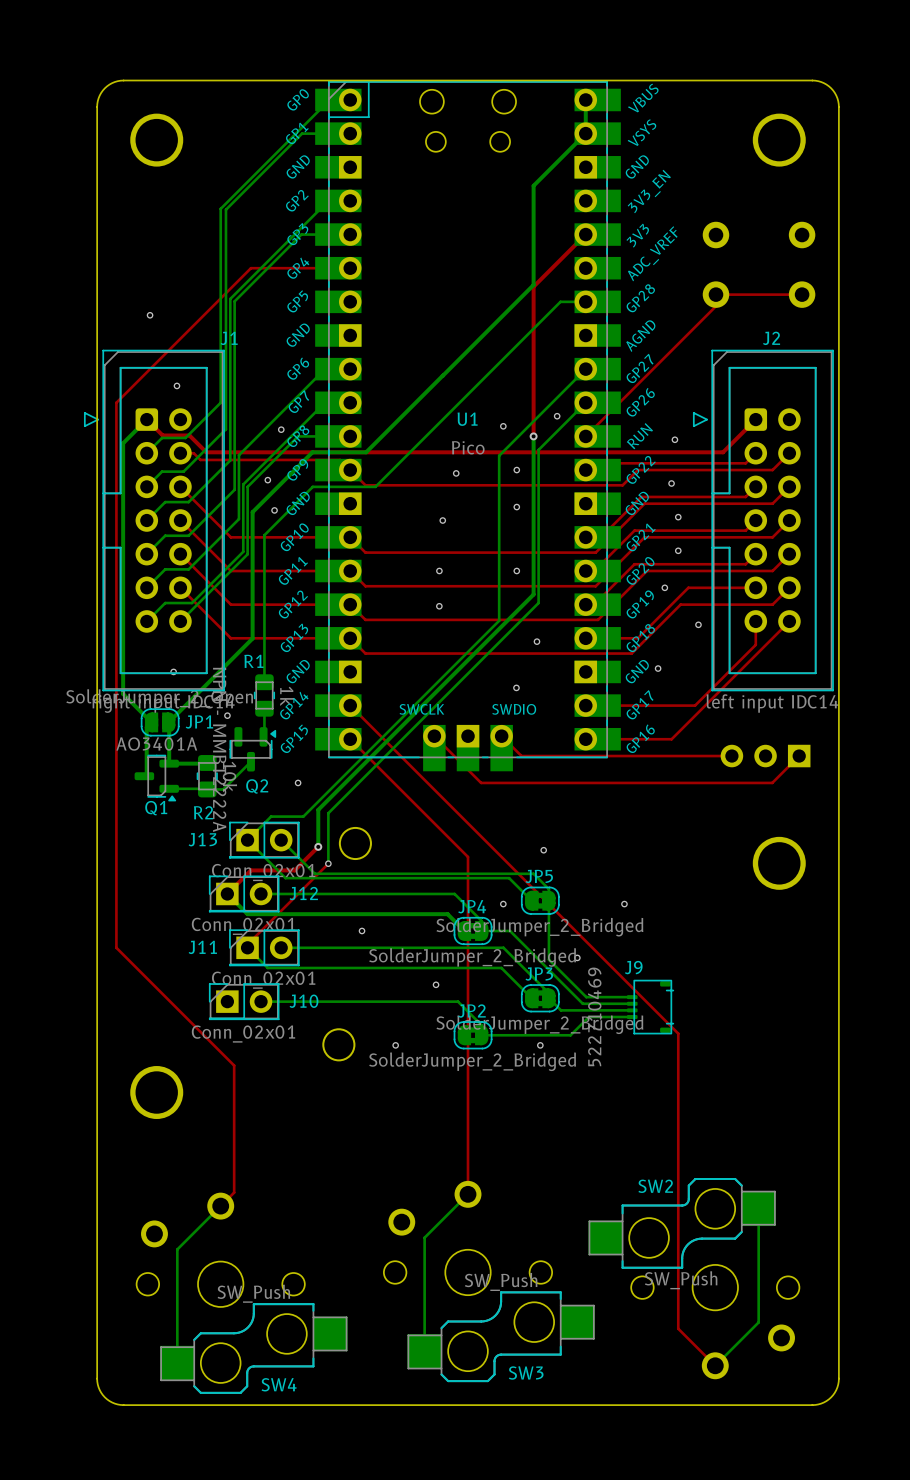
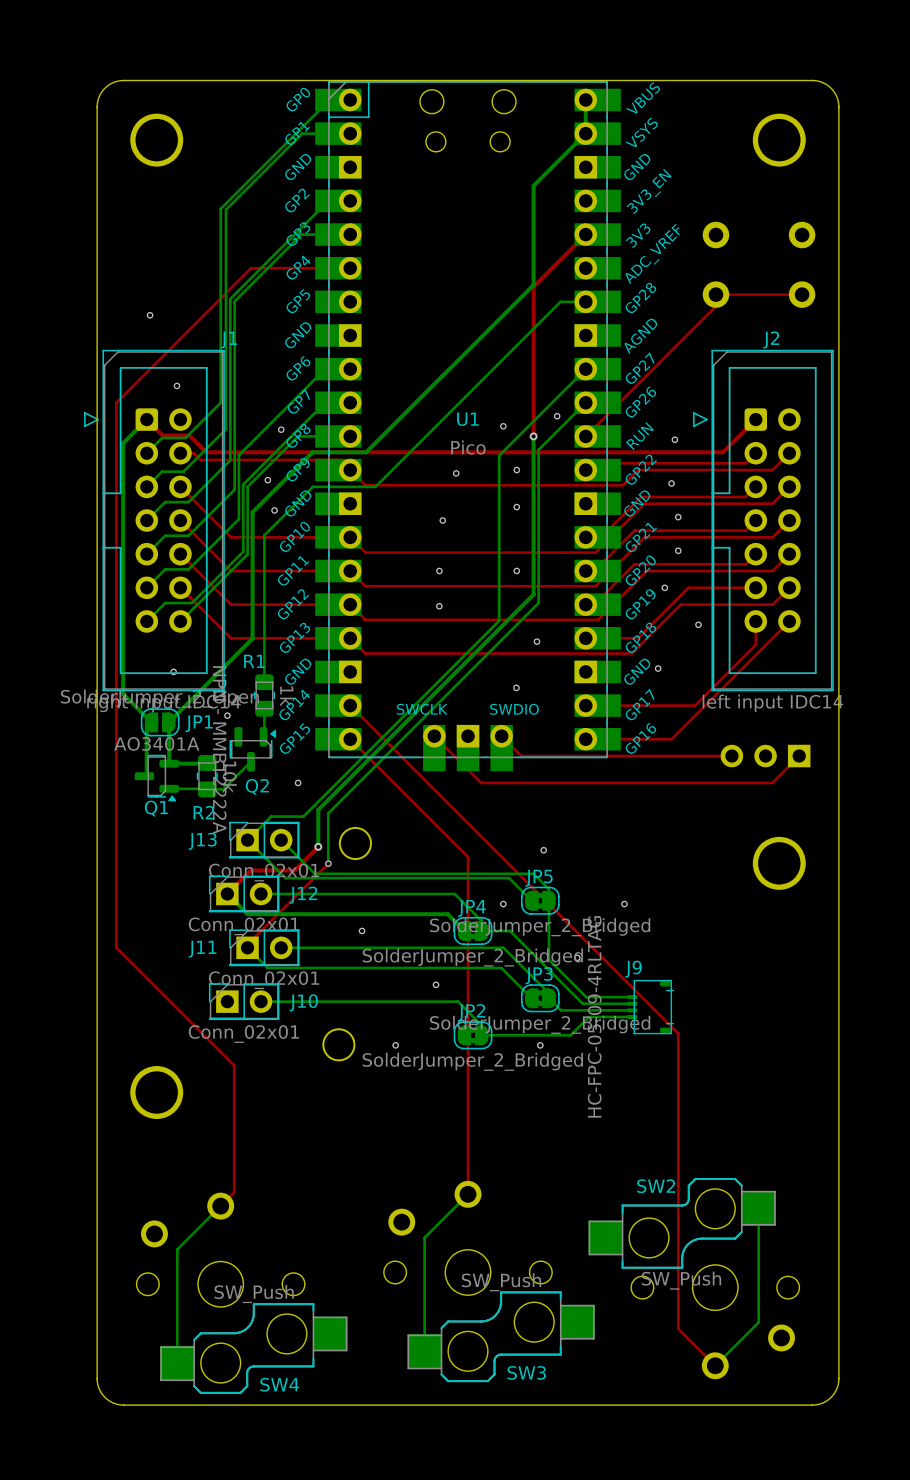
J9 value: 522710469 (594, 1016) -> HC-FPC-05-09-4RLTAG (594, 1016)

